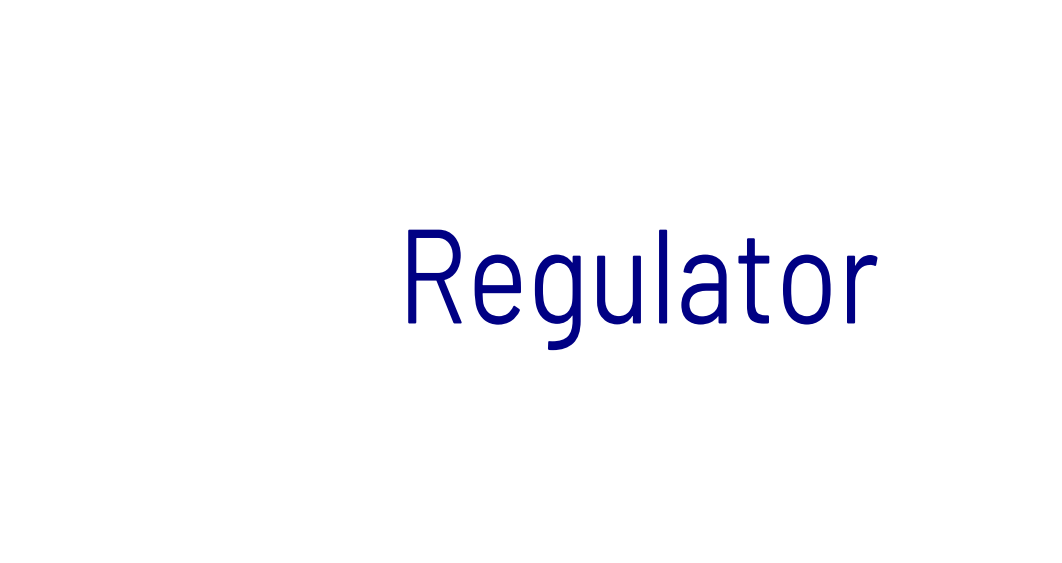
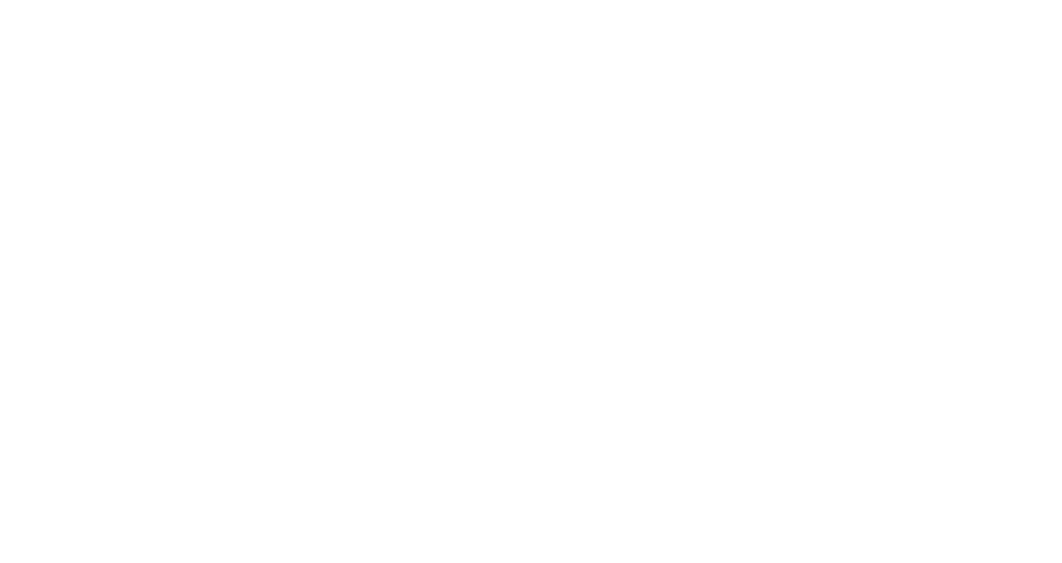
text: Regulator (642, 289) -> none

